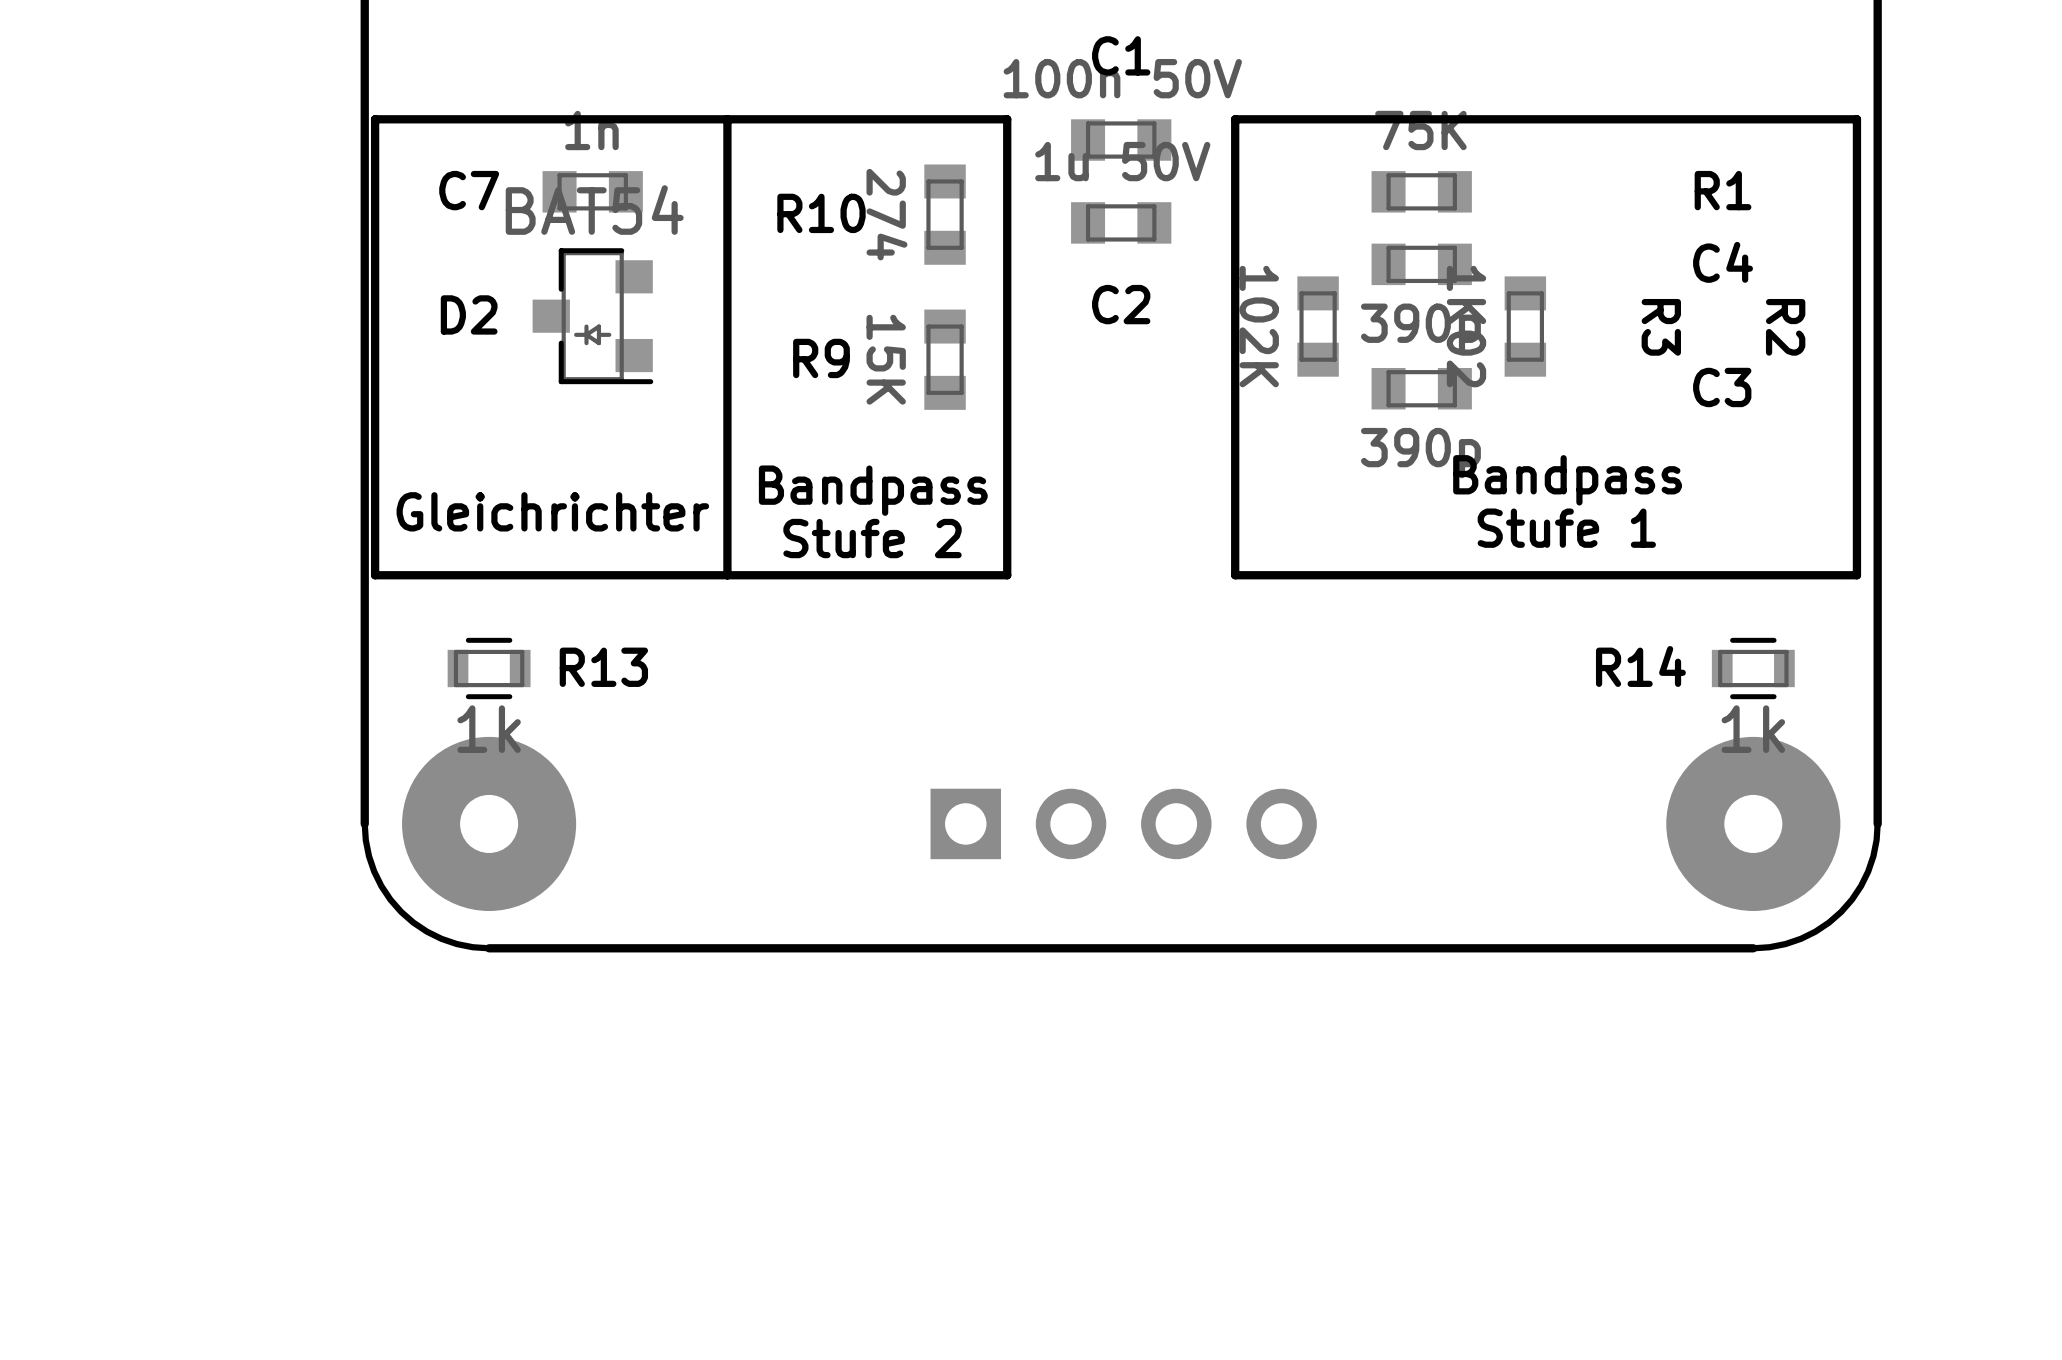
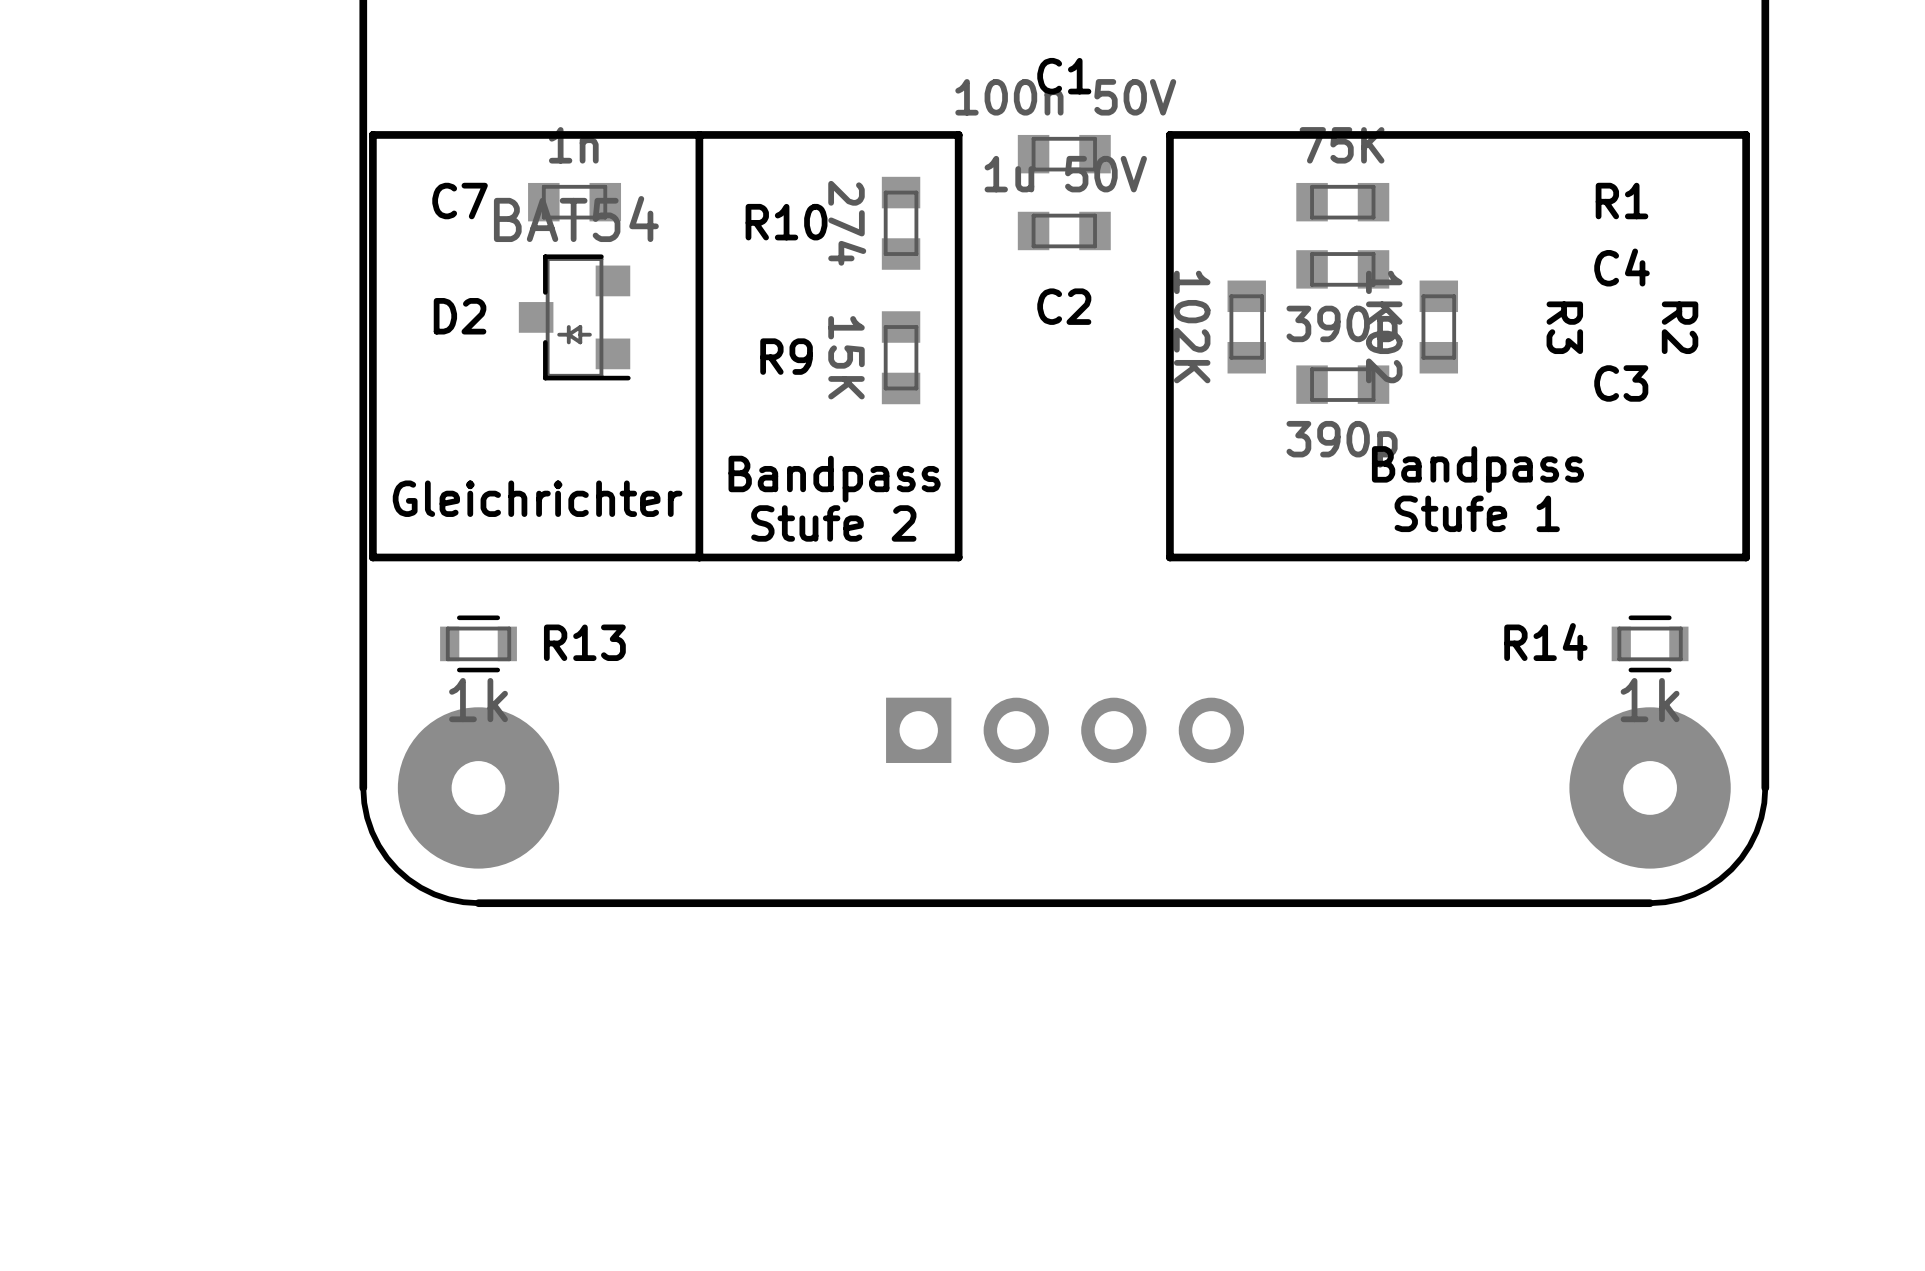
part position: (1123, 823) -> (1065, 730)

